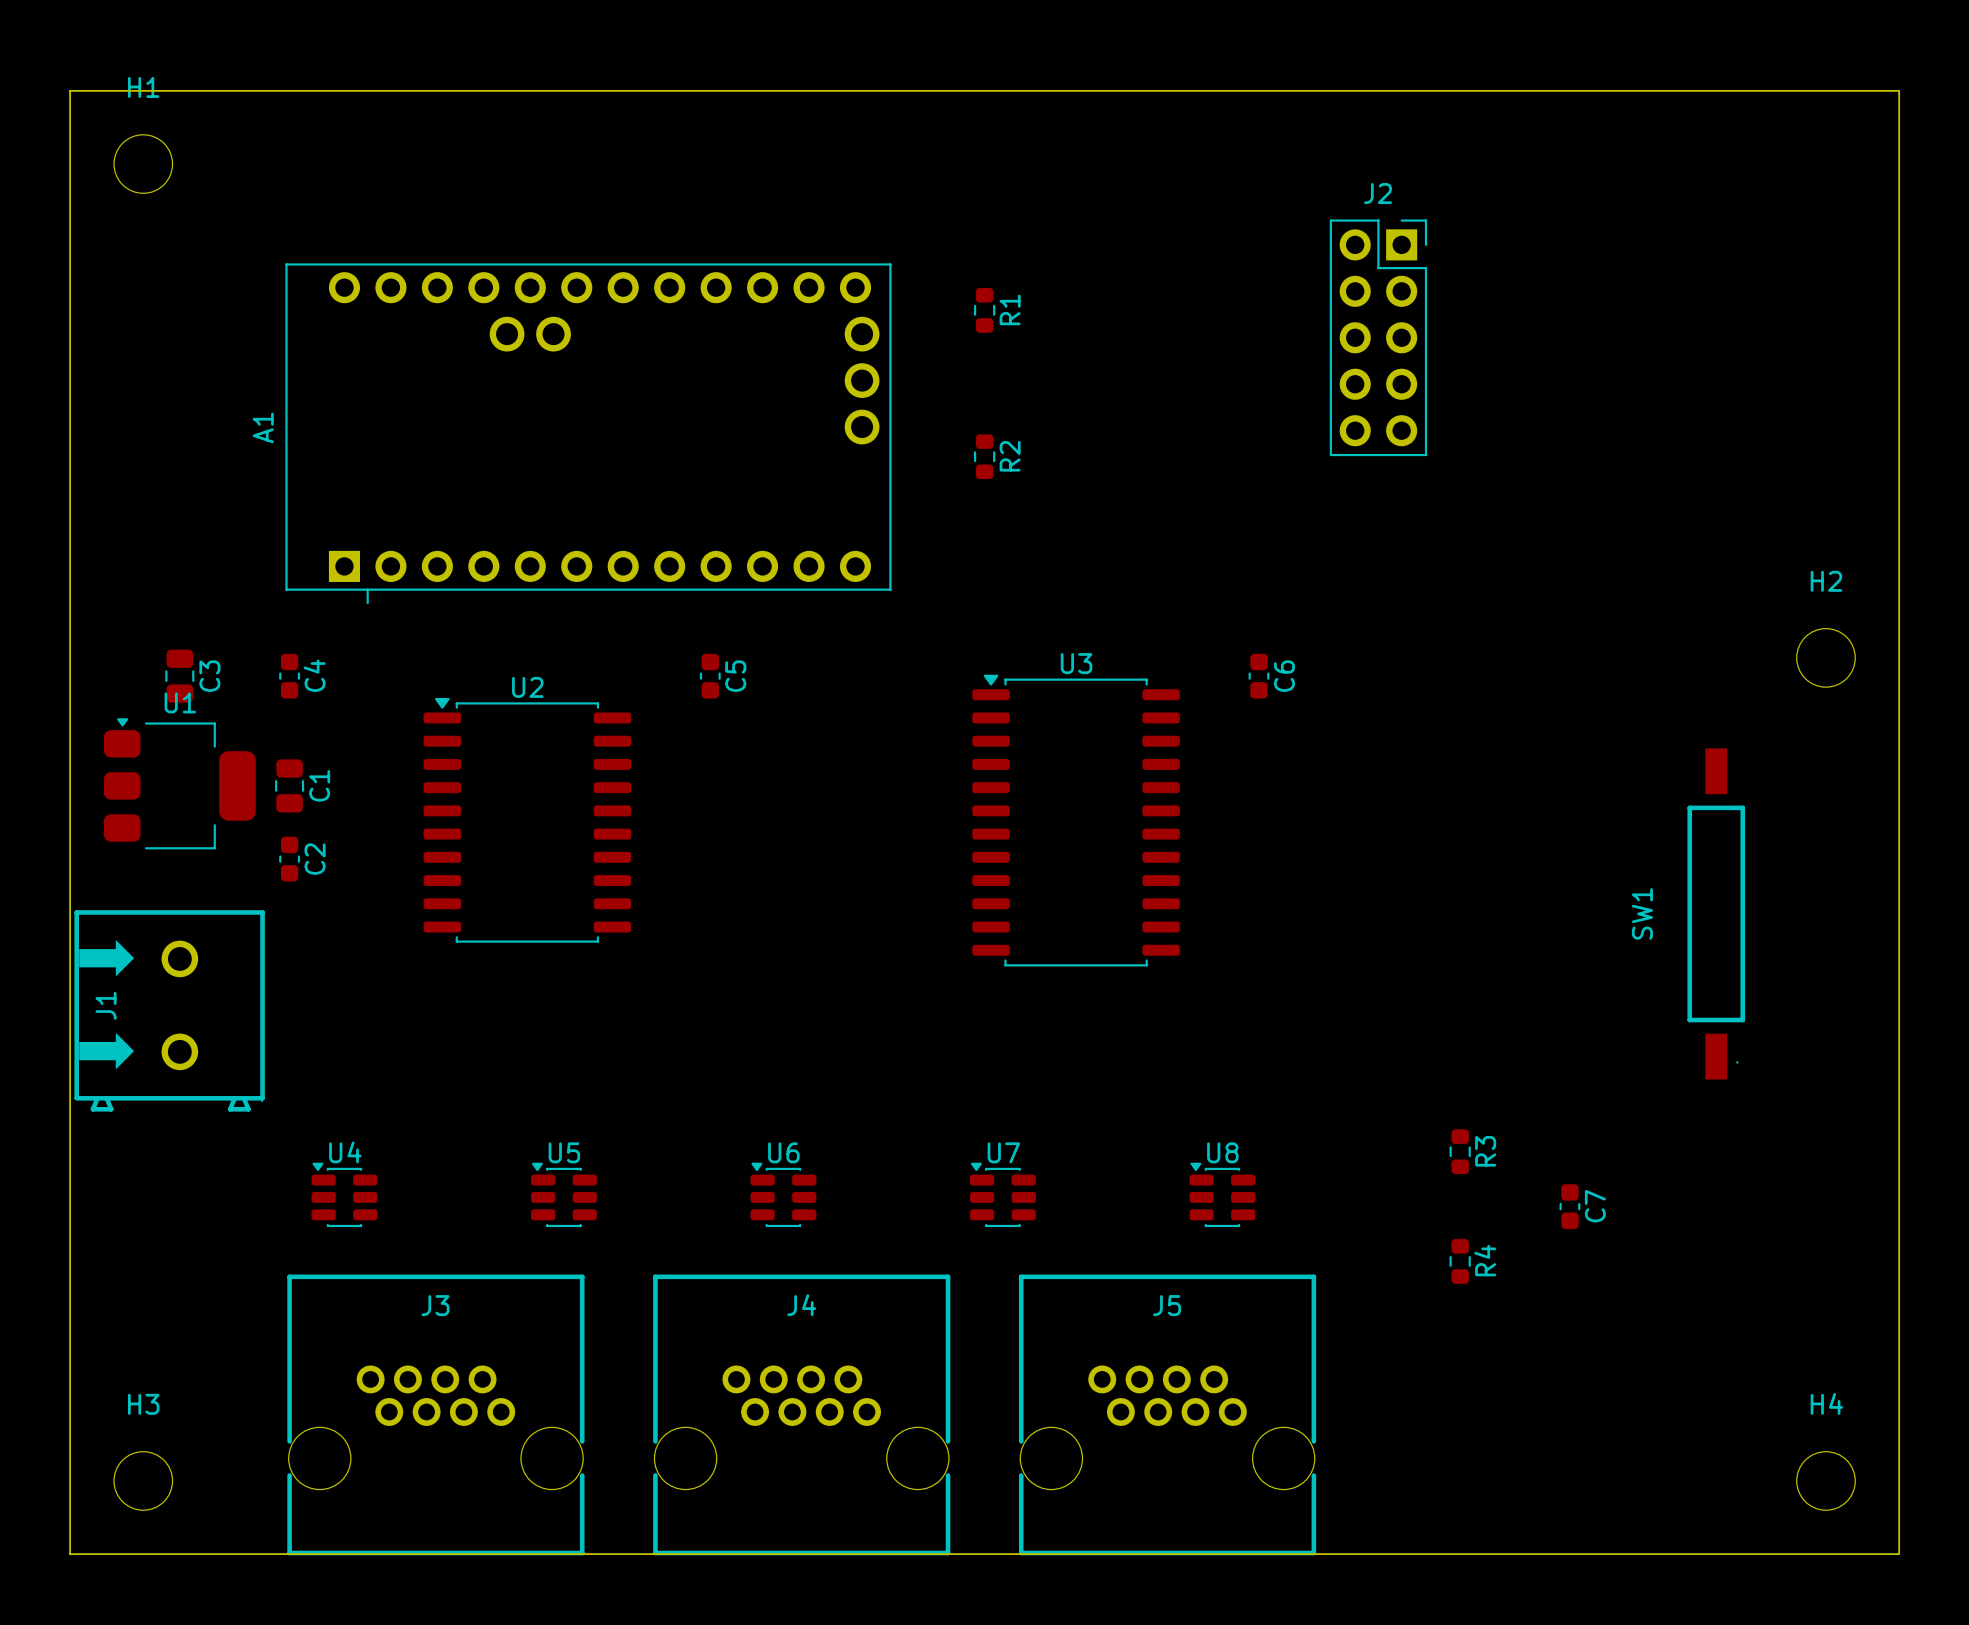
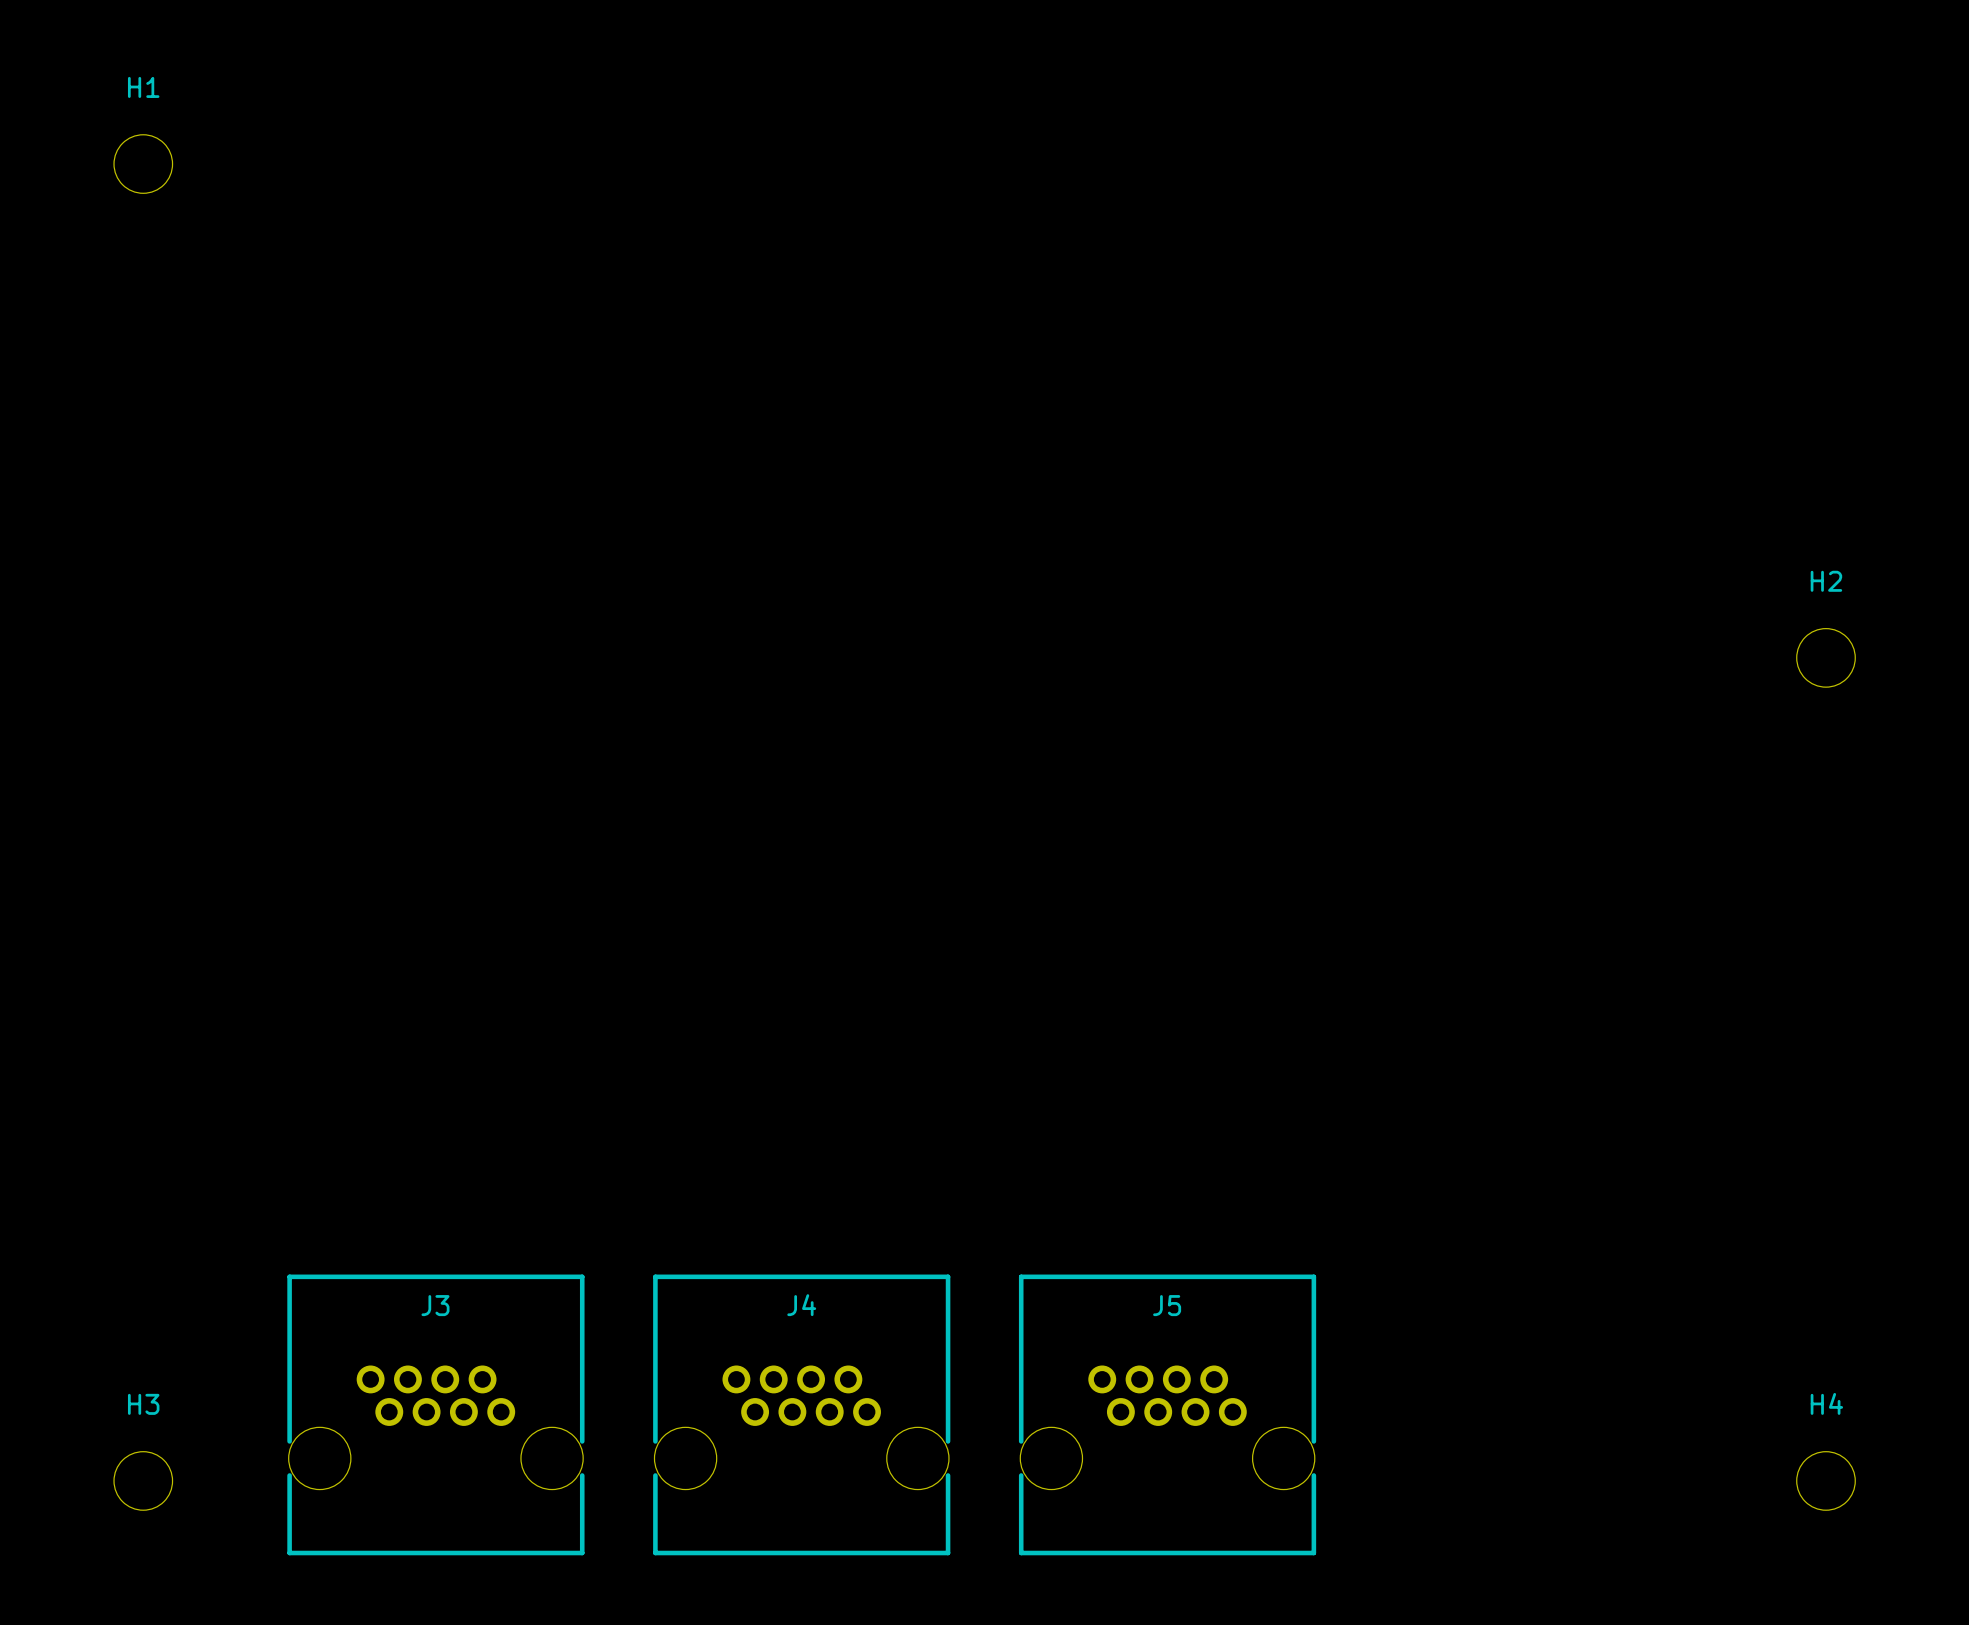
board edge: (70, 90) (1899, 90) (1899, 1554) (70, 1554) (70, 90) -> none
R1: (984, 310) -> none
J2: (1378, 337) -> none
A1: (588, 433) -> none
R2: (984, 456) -> none
C3: (179, 676) -> none
C4: (289, 676) -> none
C5: (710, 676) -> none
C6: (1258, 676) -> none
U1: (179, 783) -> none
C1: (289, 785) -> none
U2: (527, 820) -> none
U3: (1076, 820) -> none
C2: (289, 859) -> none
SW1: (1716, 913) -> none
J1: (169, 1010) -> none
R3: (1460, 1151) -> none
U4: (344, 1194) -> none
U5: (563, 1194) -> none
U6: (783, 1194) -> none
U7: (1002, 1194) -> none
U8: (1222, 1194) -> none
C7: (1569, 1206) -> none
R4: (1460, 1261) -> none

